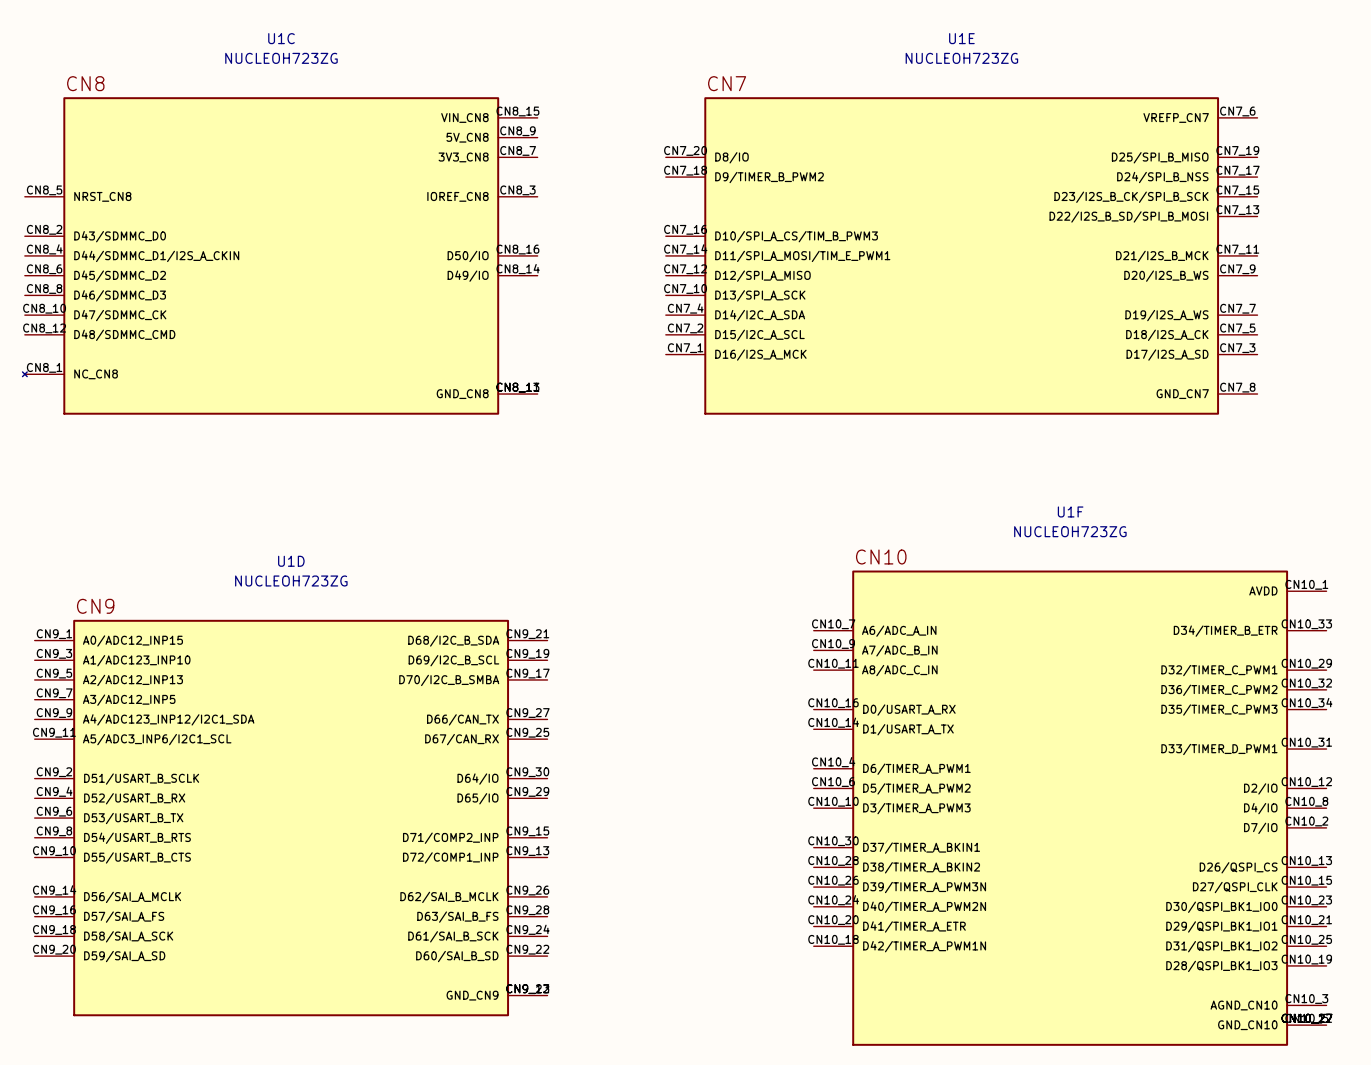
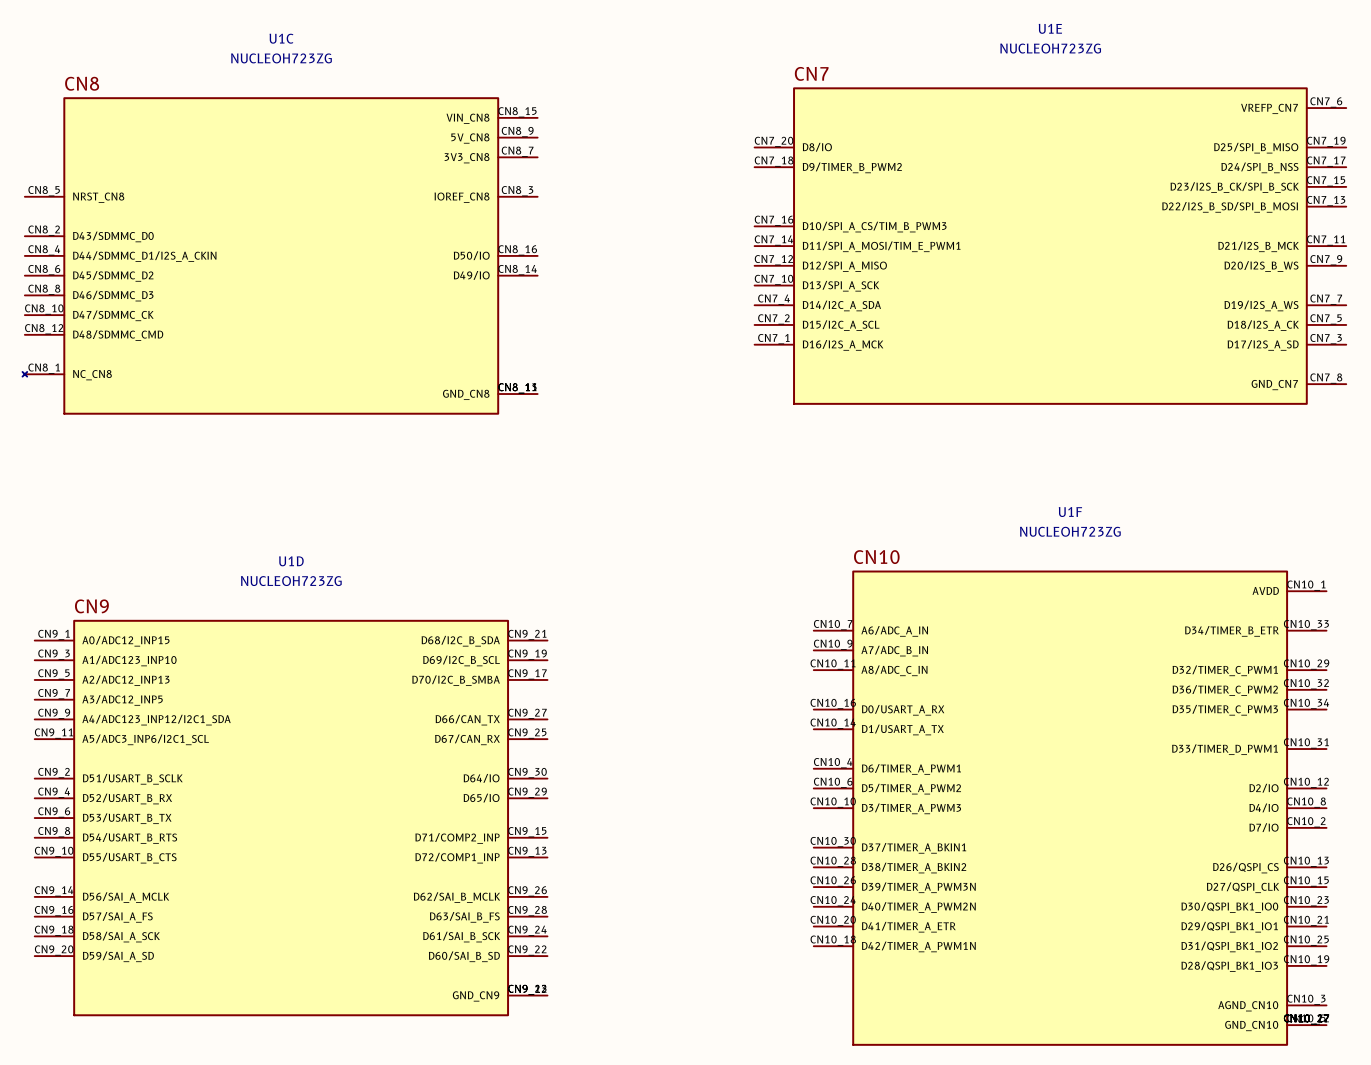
U1E position: (961, 255) -> (1050, 246)

